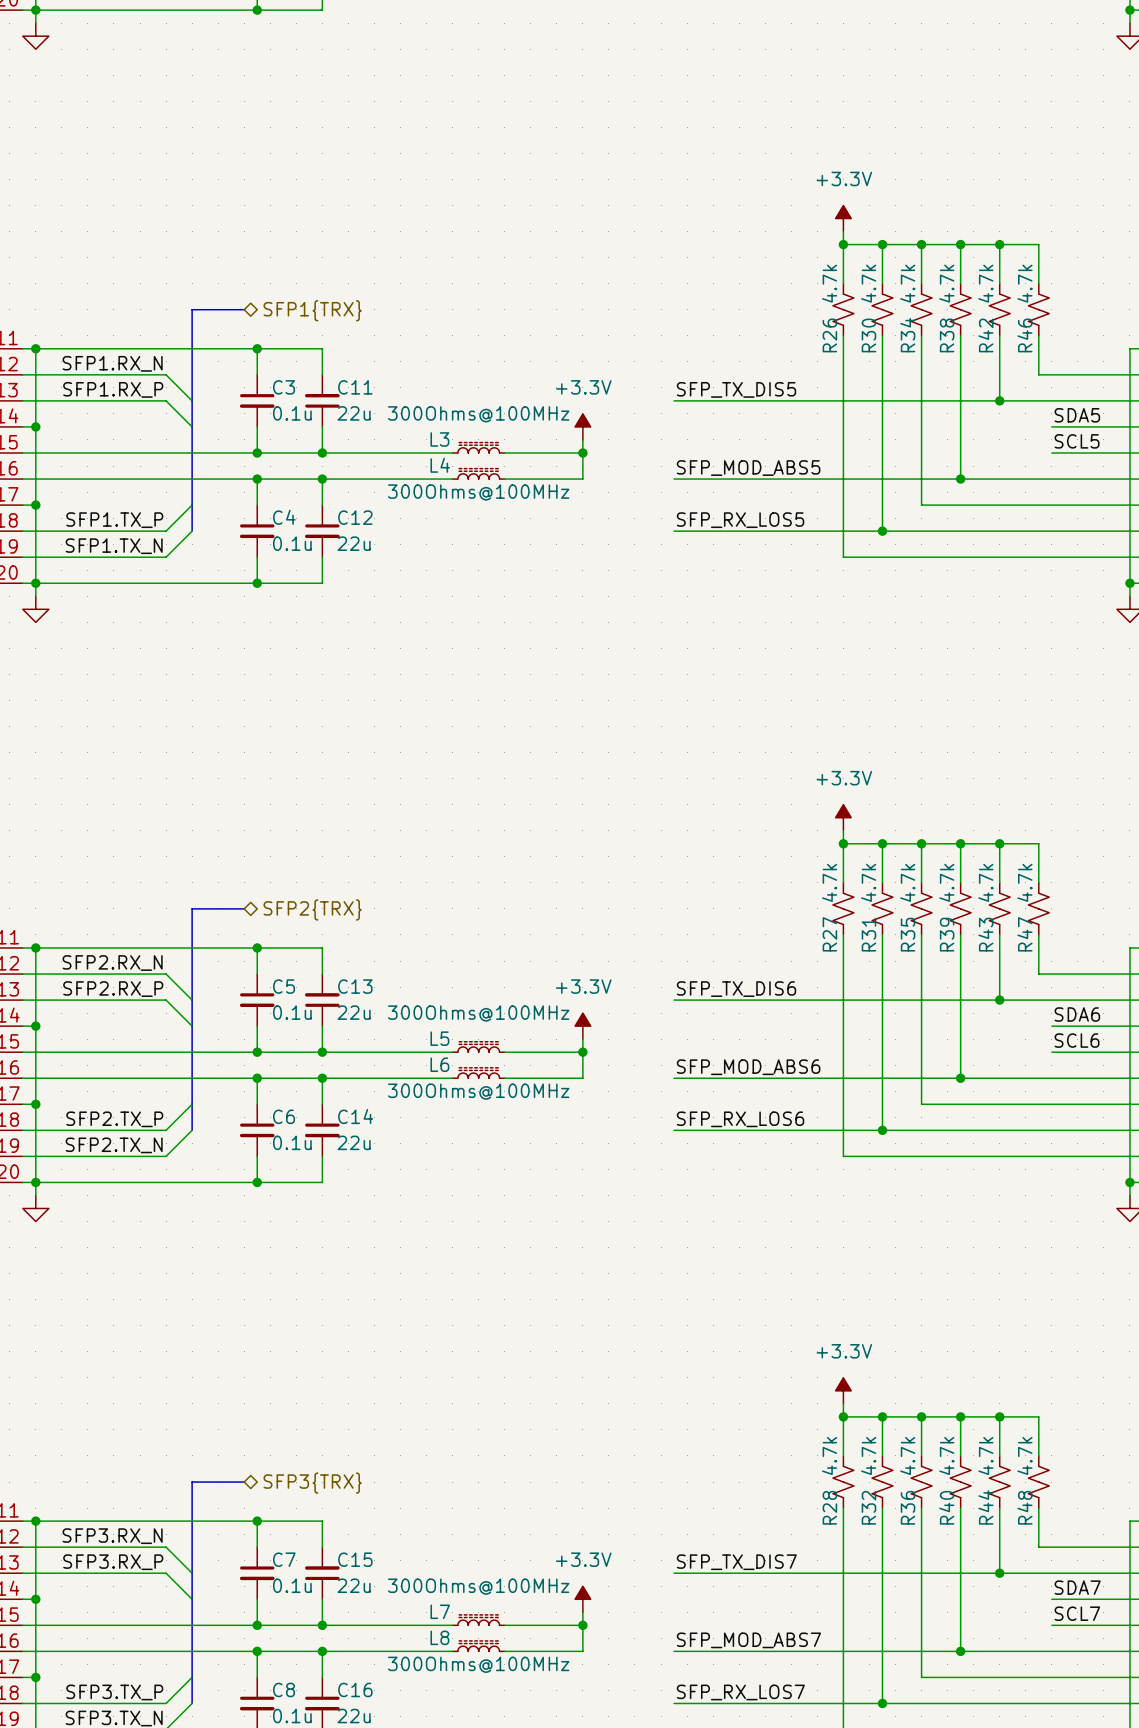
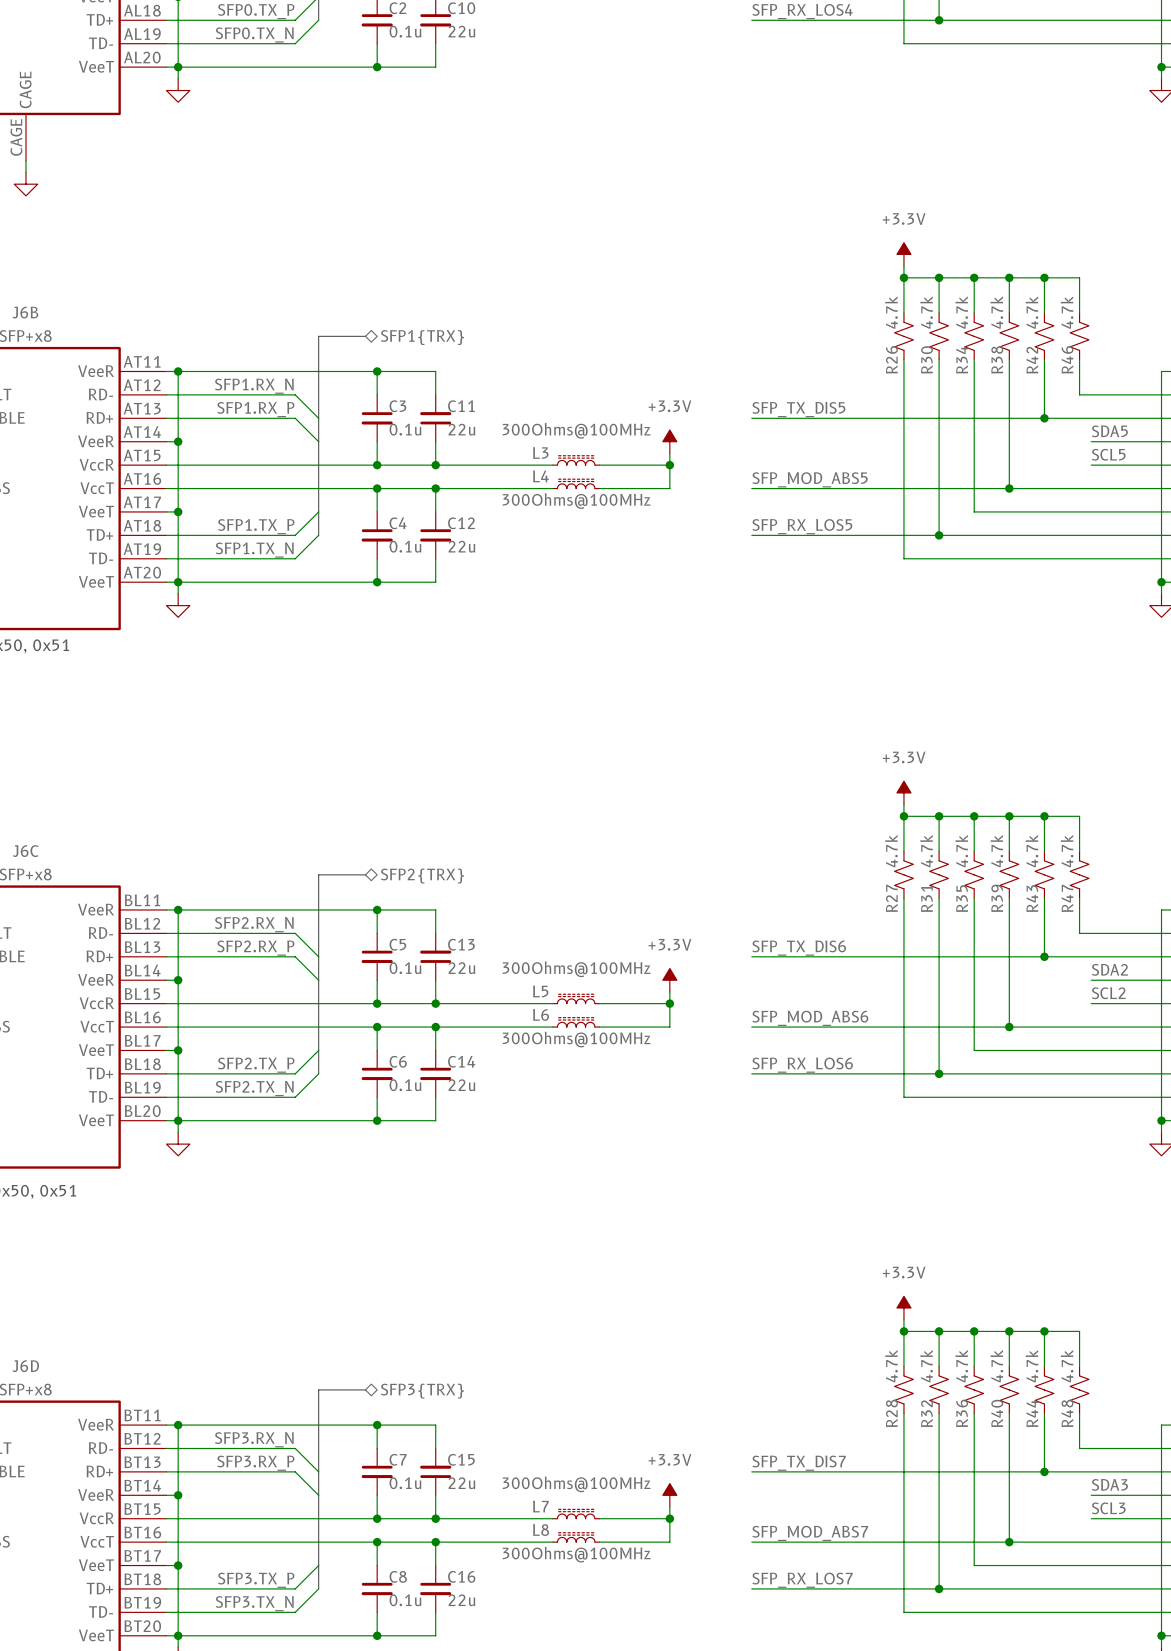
label: SDA6 (1077, 1014) -> SDA2 (1109, 969)
label: SCL6 (1077, 1040) -> SCL2 (1108, 993)
label: SDA7 (1077, 1587) -> SDA3 (1109, 1484)
label: SCL7 (1077, 1613) -> SCL3 (1108, 1508)

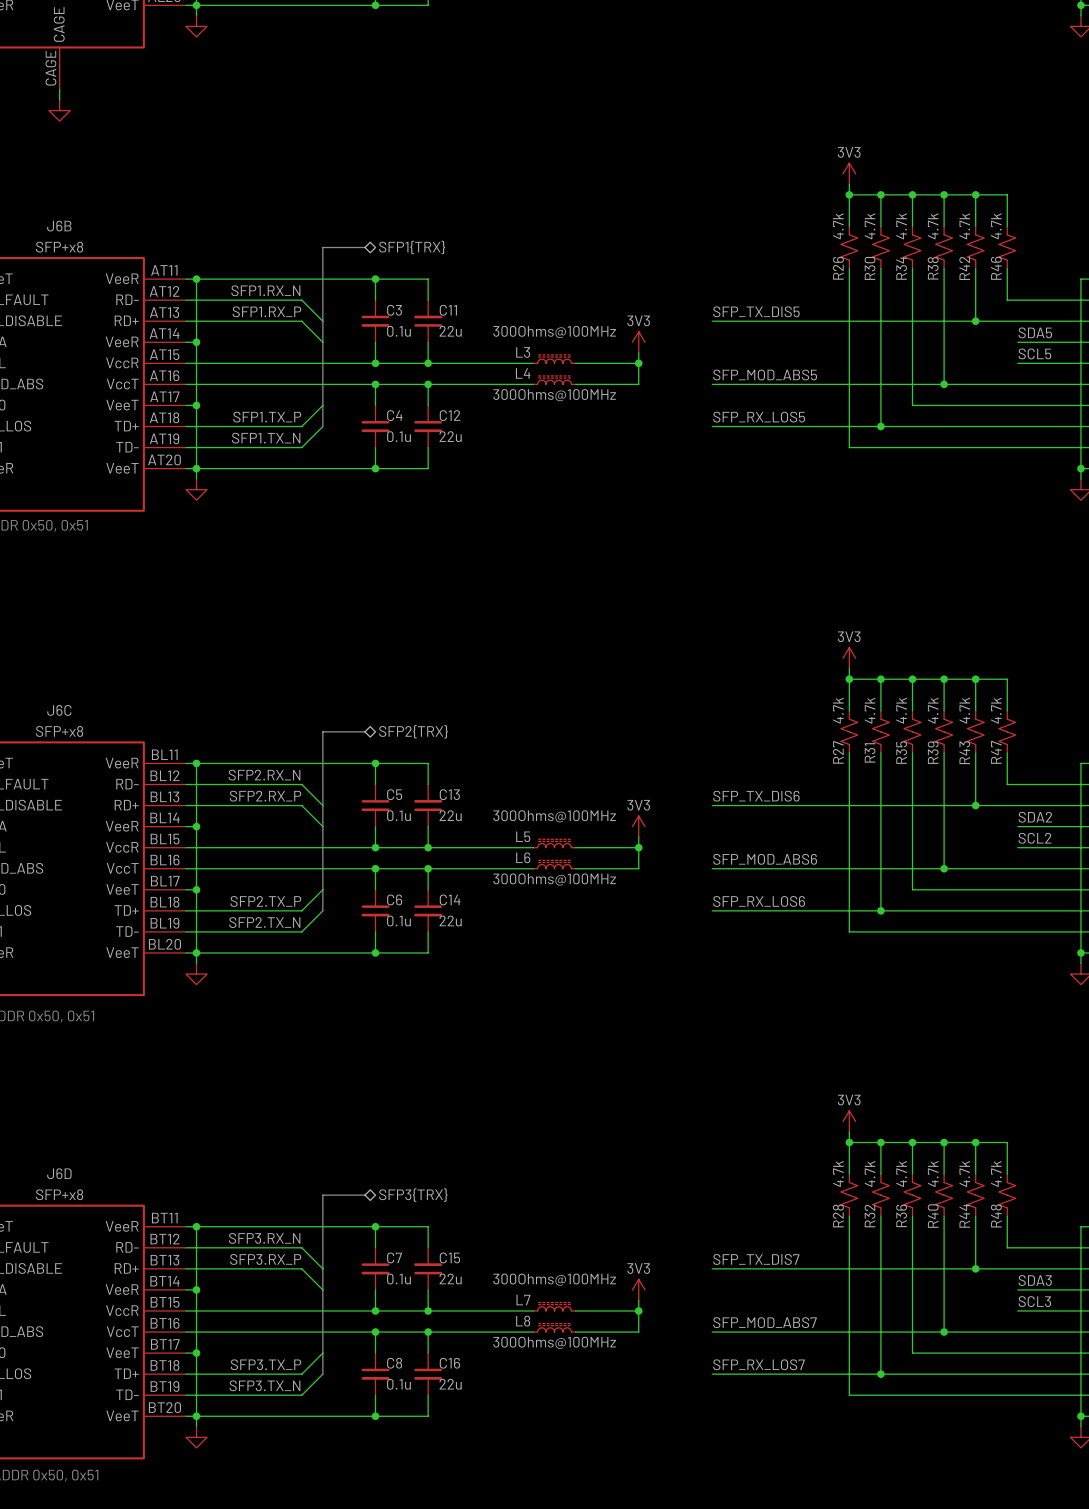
power symbol: +3.3V (903, 254) -> 3V3 (849, 173)
power symbol: +3.3V (669, 441) -> 3V3 (638, 342)
power symbol: +3.3V (903, 792) -> 3V3 (849, 658)
power symbol: +3.3V (669, 980) -> 3V3 (638, 826)
power symbol: +3.3V (903, 1308) -> 3V3 (849, 1121)
power symbol: +3.3V (669, 1495) -> 3V3 (638, 1289)

